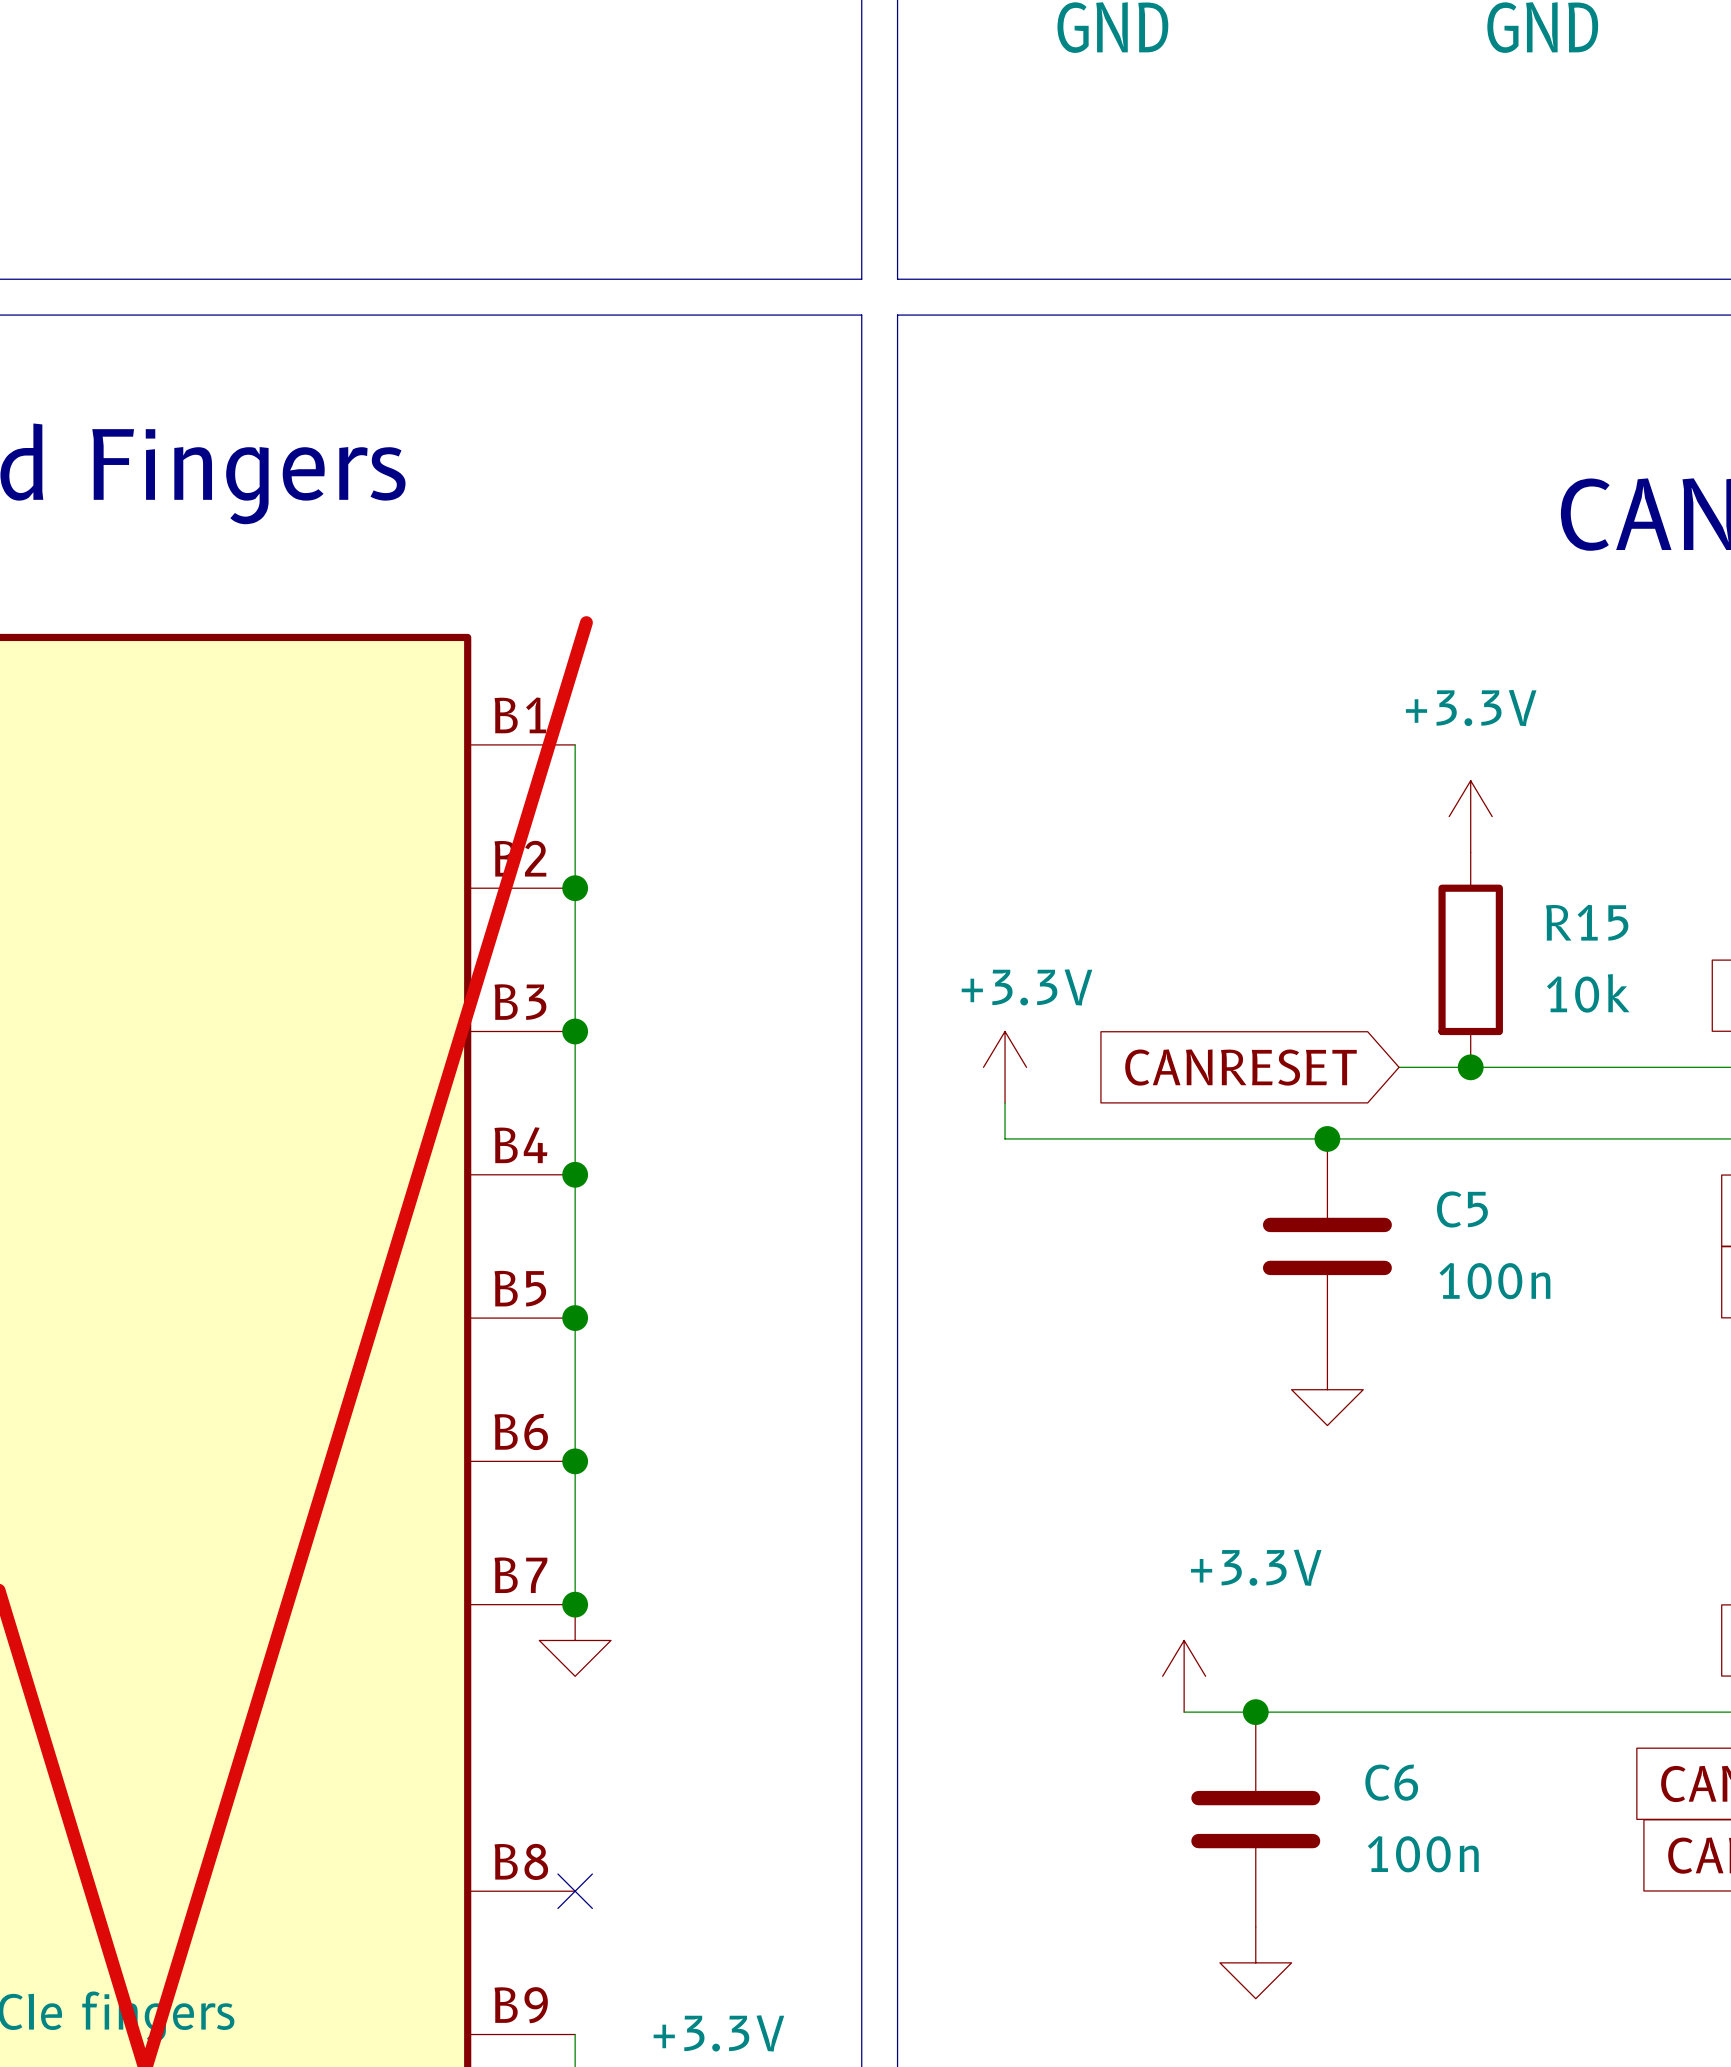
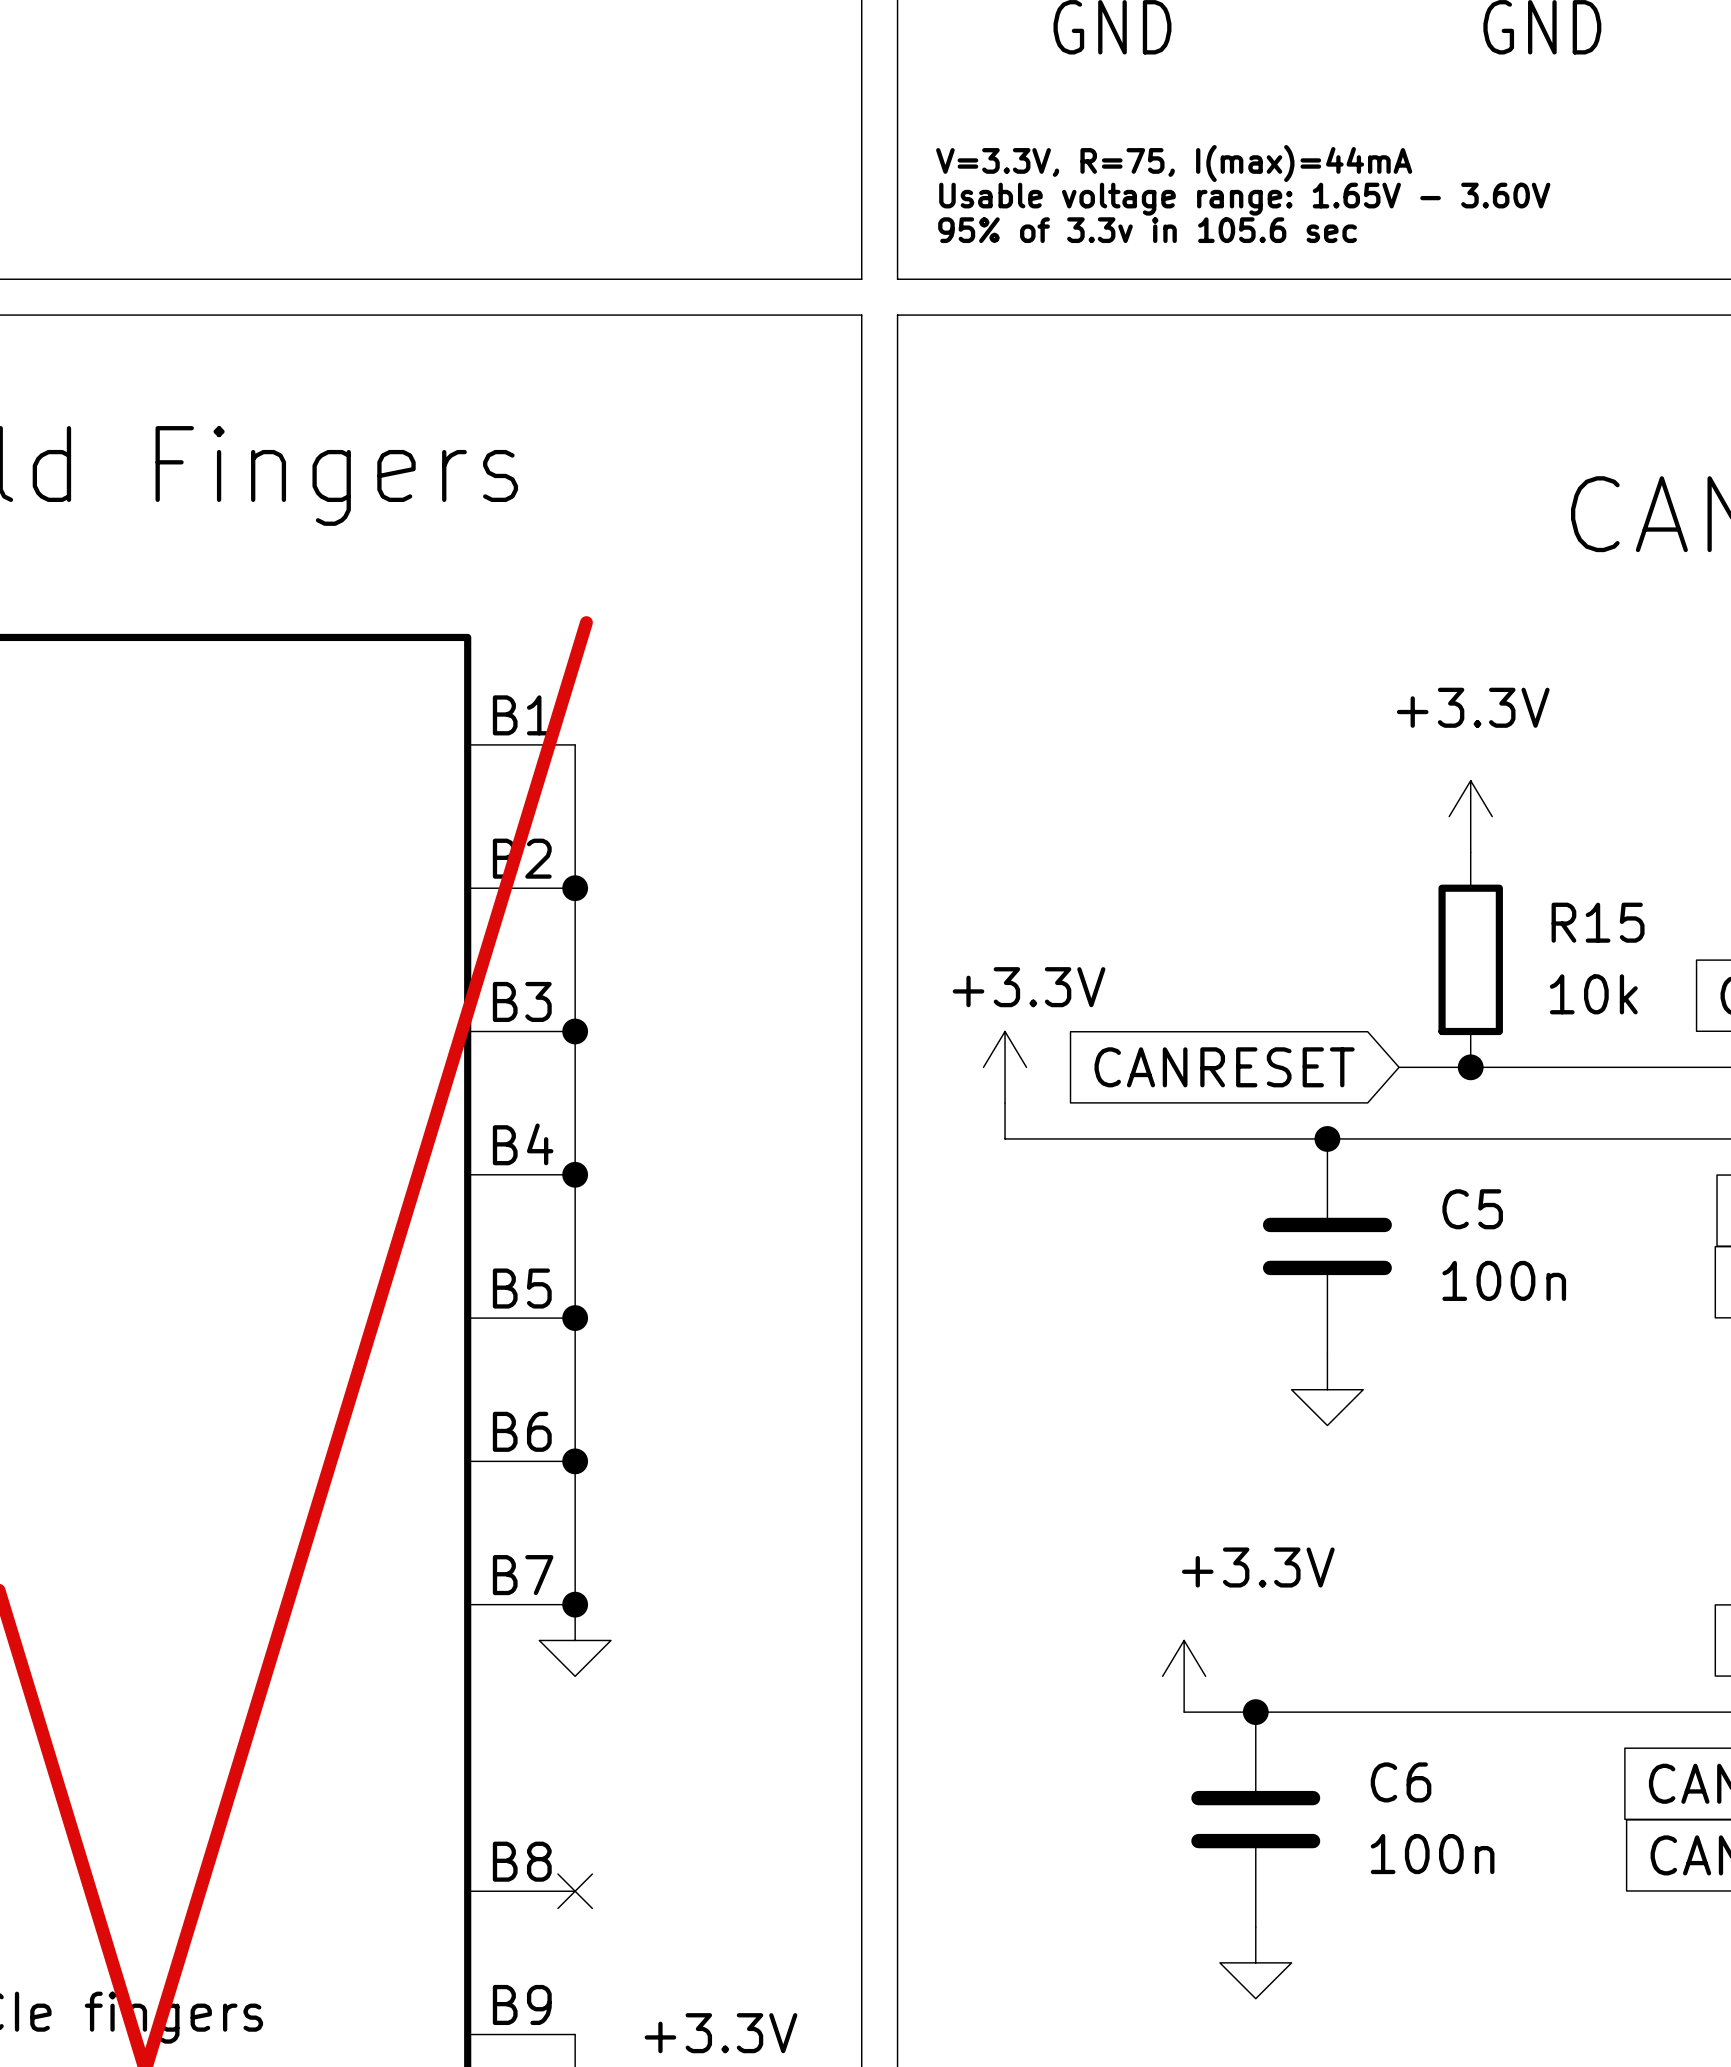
text: none -> V=3.3V, R=75, I(max)=44mA (1174, 163)
text: none -> Usable voltage range: 1.65V - 3.60V (1244, 199)
text: none -> 95% of 3.3v in 105.6 sec (1147, 230)

